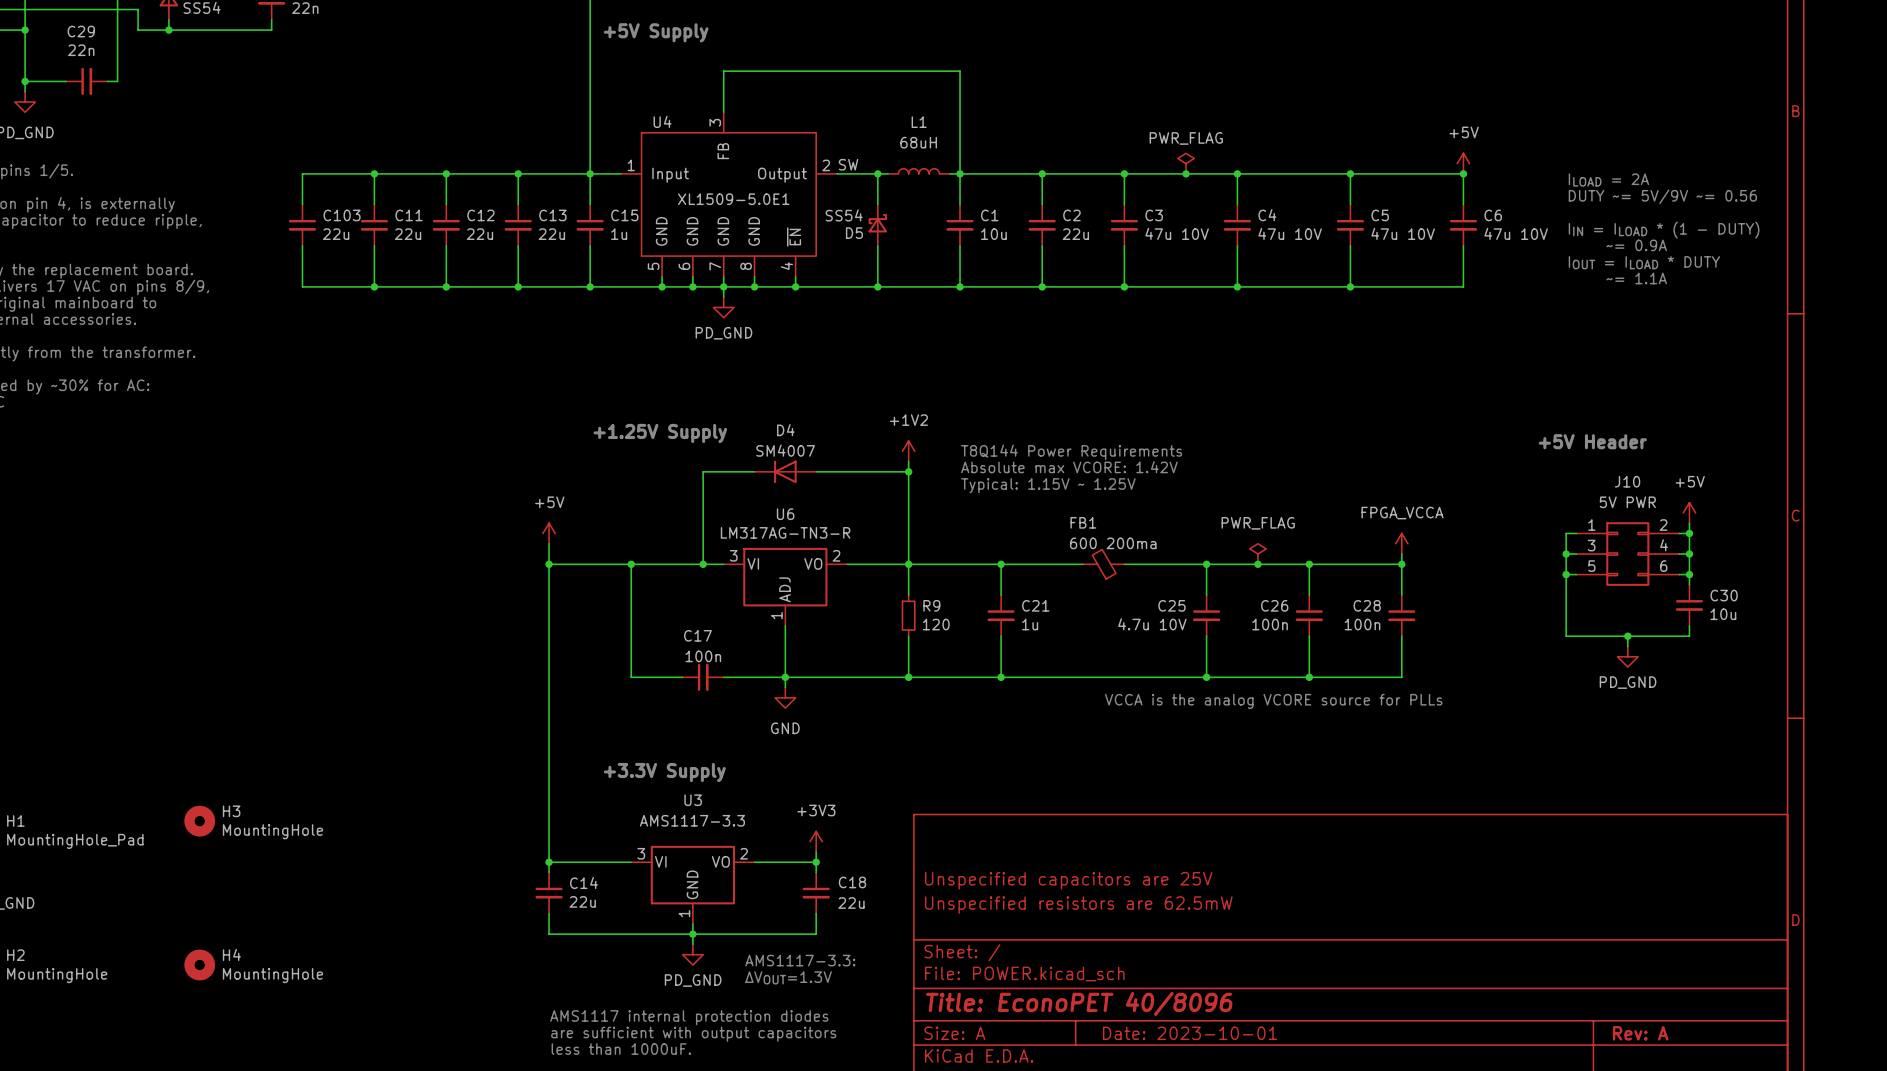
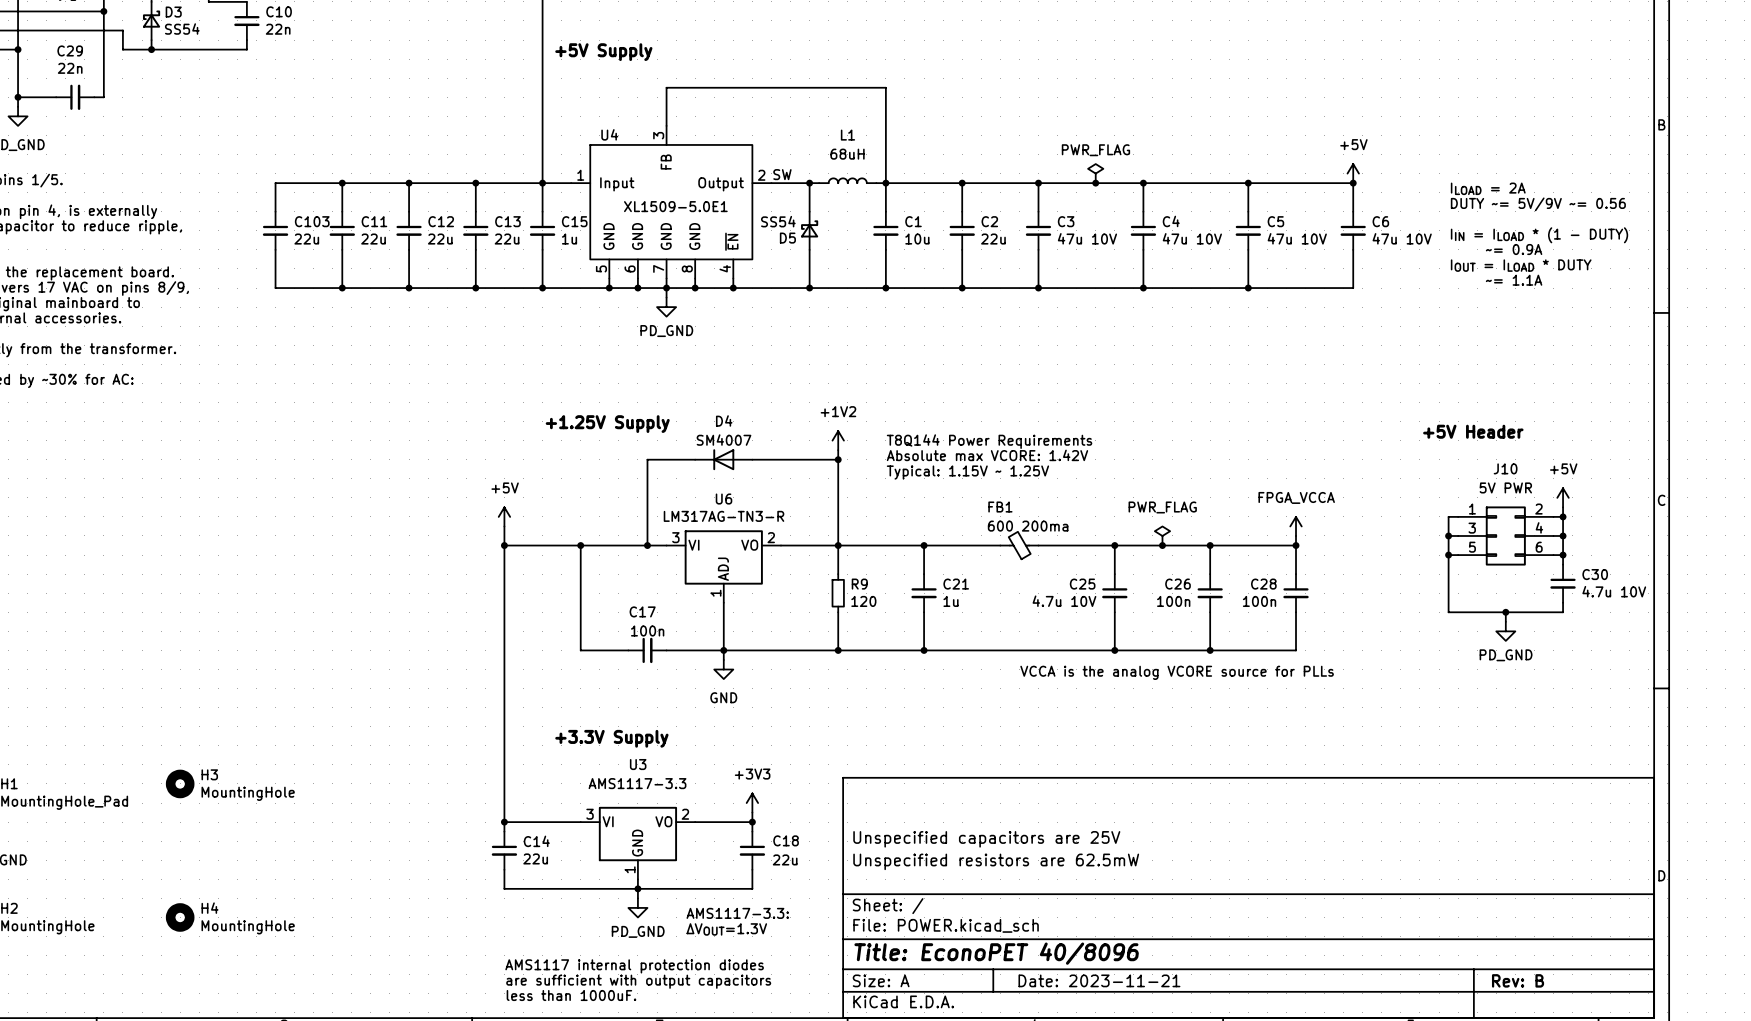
C30 value: 10u (1723, 614) -> 4.7u 10V (1614, 591)
title block: Date: 2023-10-01 (1190, 1033) -> Date: 2023-11-21 (1099, 980)
title block: Rev: A (1640, 1033) -> Rev: B (1518, 980)

